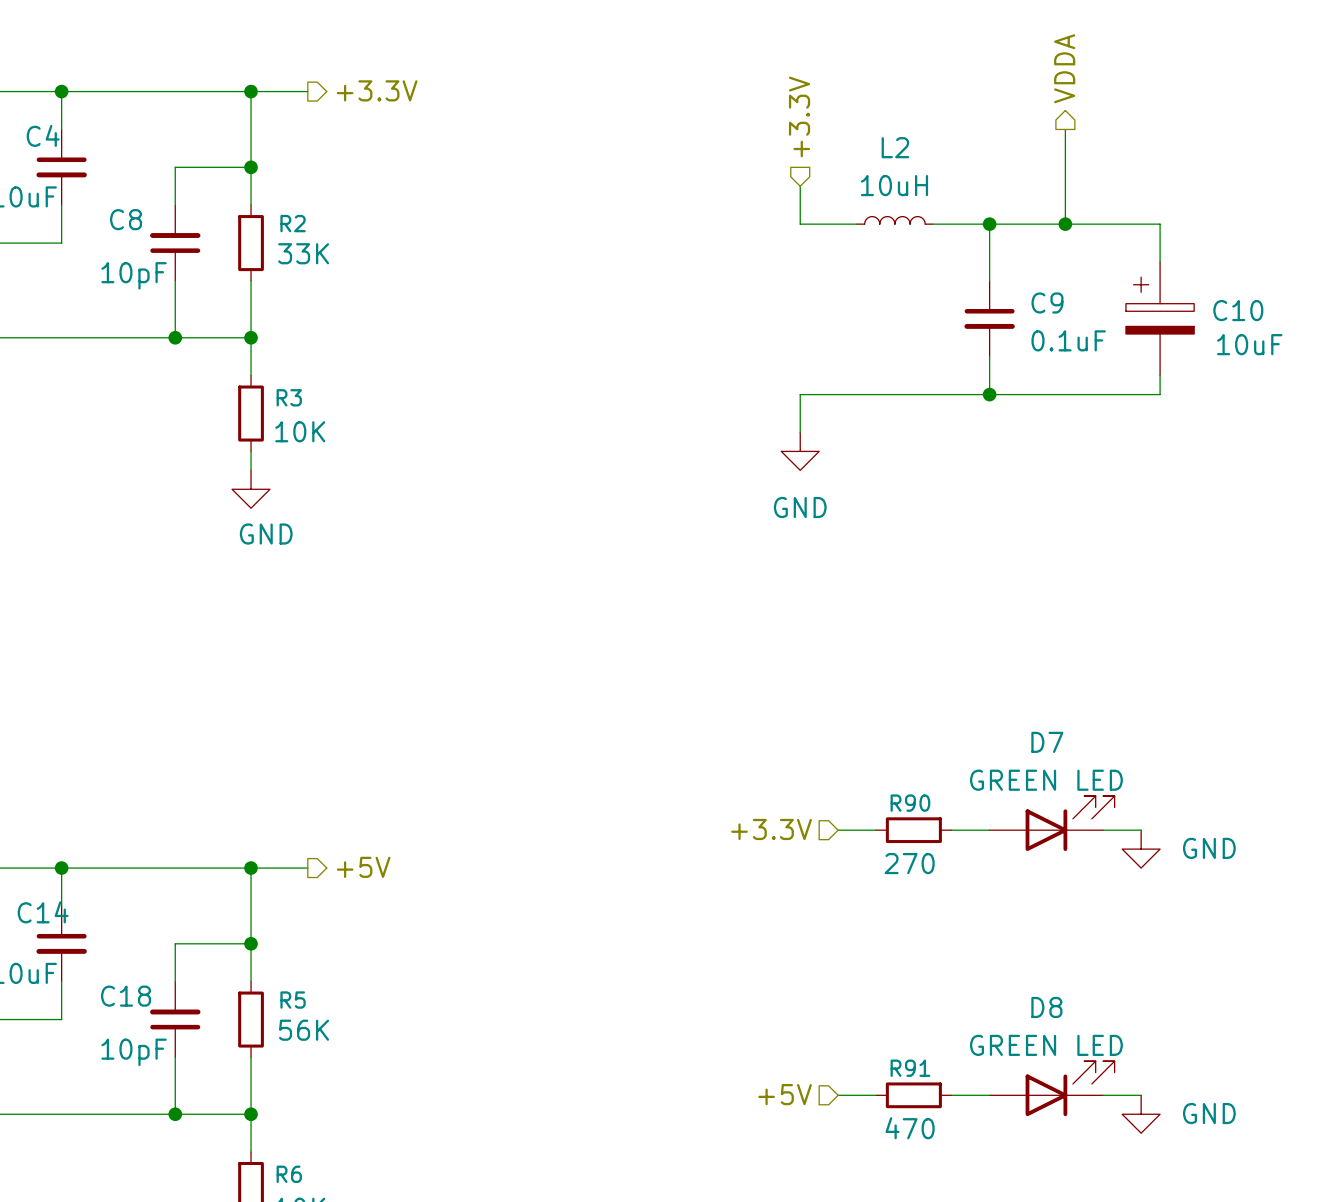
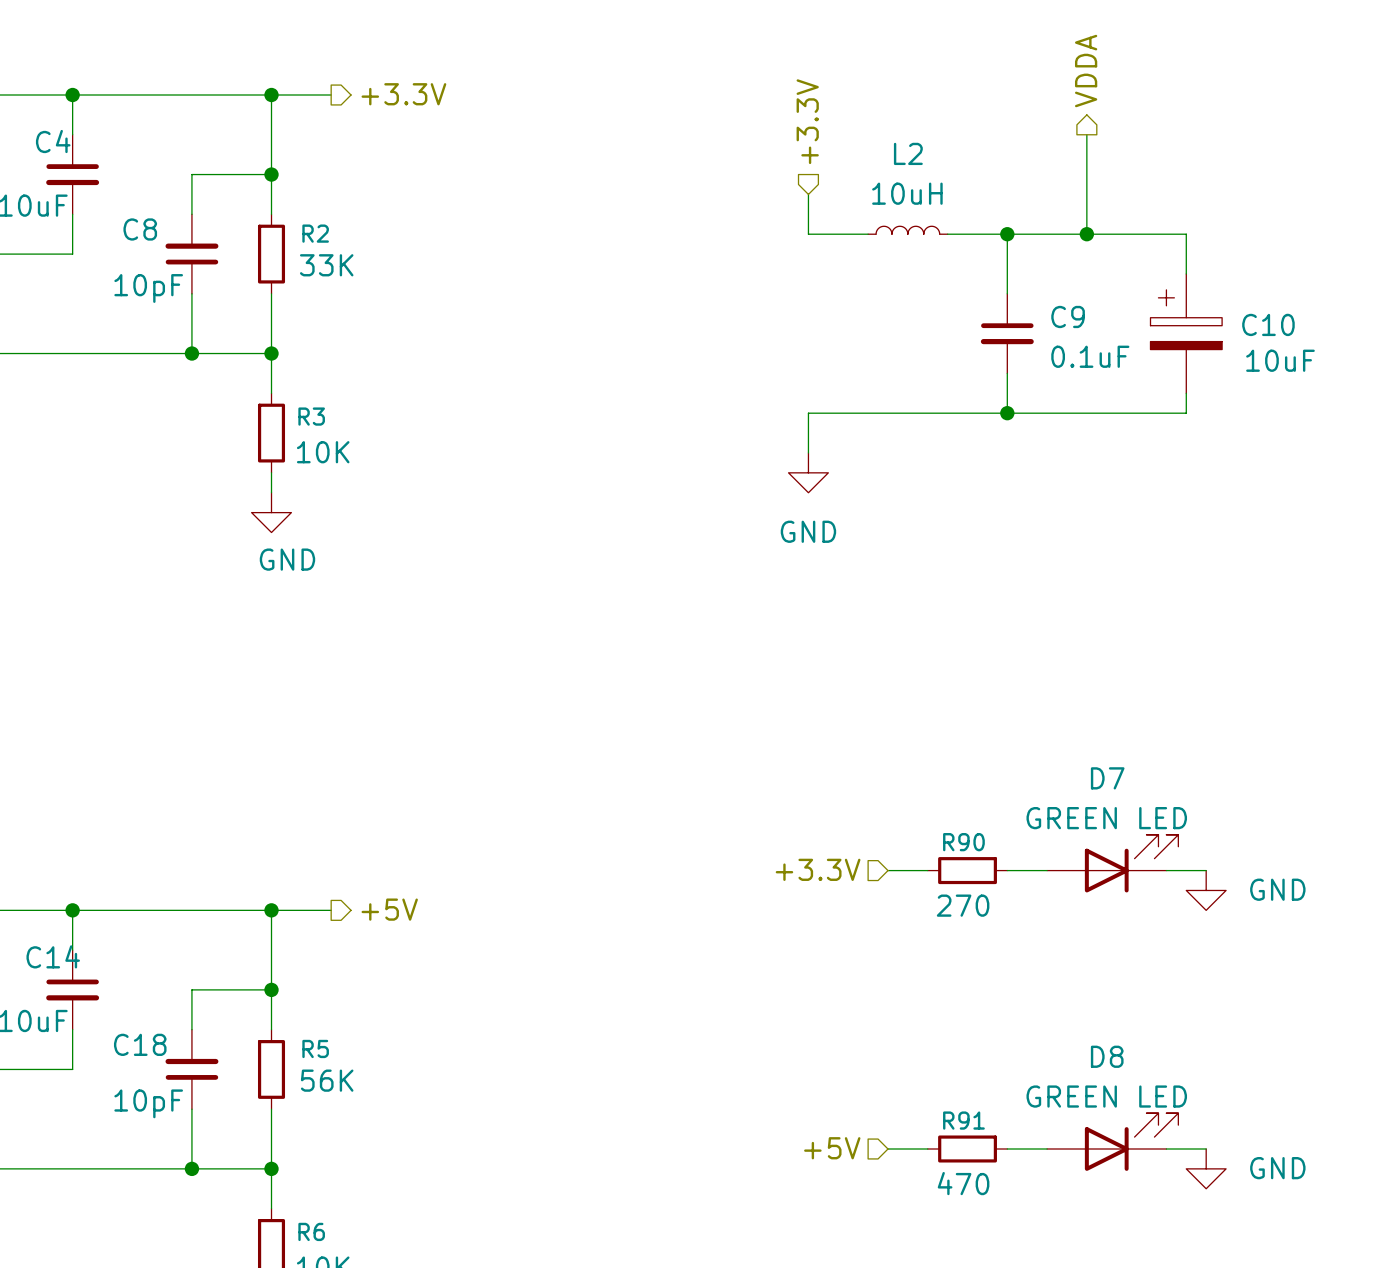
hierarchical label position: VDDA (1064, 68) -> VDDA (1086, 71)
hierarchical label position: +3.3V (799, 116) -> +3.3V (807, 121)
wire: (1065, 129) (1065, 224) -> (1086, 134) (1086, 234)
wire: (800, 186) (800, 224) -> (808, 194) (808, 234) (848, 234)
L2 position: (894, 220) -> (907, 230)
wire: (819, 224) (857, 224) -> (947, 234) (987, 234)
junction: none -> (1007, 234)
wire: (989, 224) (989, 280) -> (1007, 234) (1007, 293)
junction: (989, 224) -> none
junction: none -> (1086, 234)
junction: (1065, 224) -> none
wire: (1122, 224) (1160, 224) (1160, 262) -> (1186, 234) (1186, 273)
C9 position: (989, 318) -> (1007, 333)
C10 position: (1160, 318) -> (1186, 333)
wire: (989, 356) (989, 394) -> (1007, 373) (1007, 413)
wire: (1160, 375) (1160, 394) (1122, 394) -> (1186, 393) (1186, 413)
wire: (800, 394) (800, 432) -> (848, 413) (808, 413) (808, 452)
junction position: (989, 394) -> (1007, 413)
power symbol position: GND (800, 451) -> GND (808, 472)

